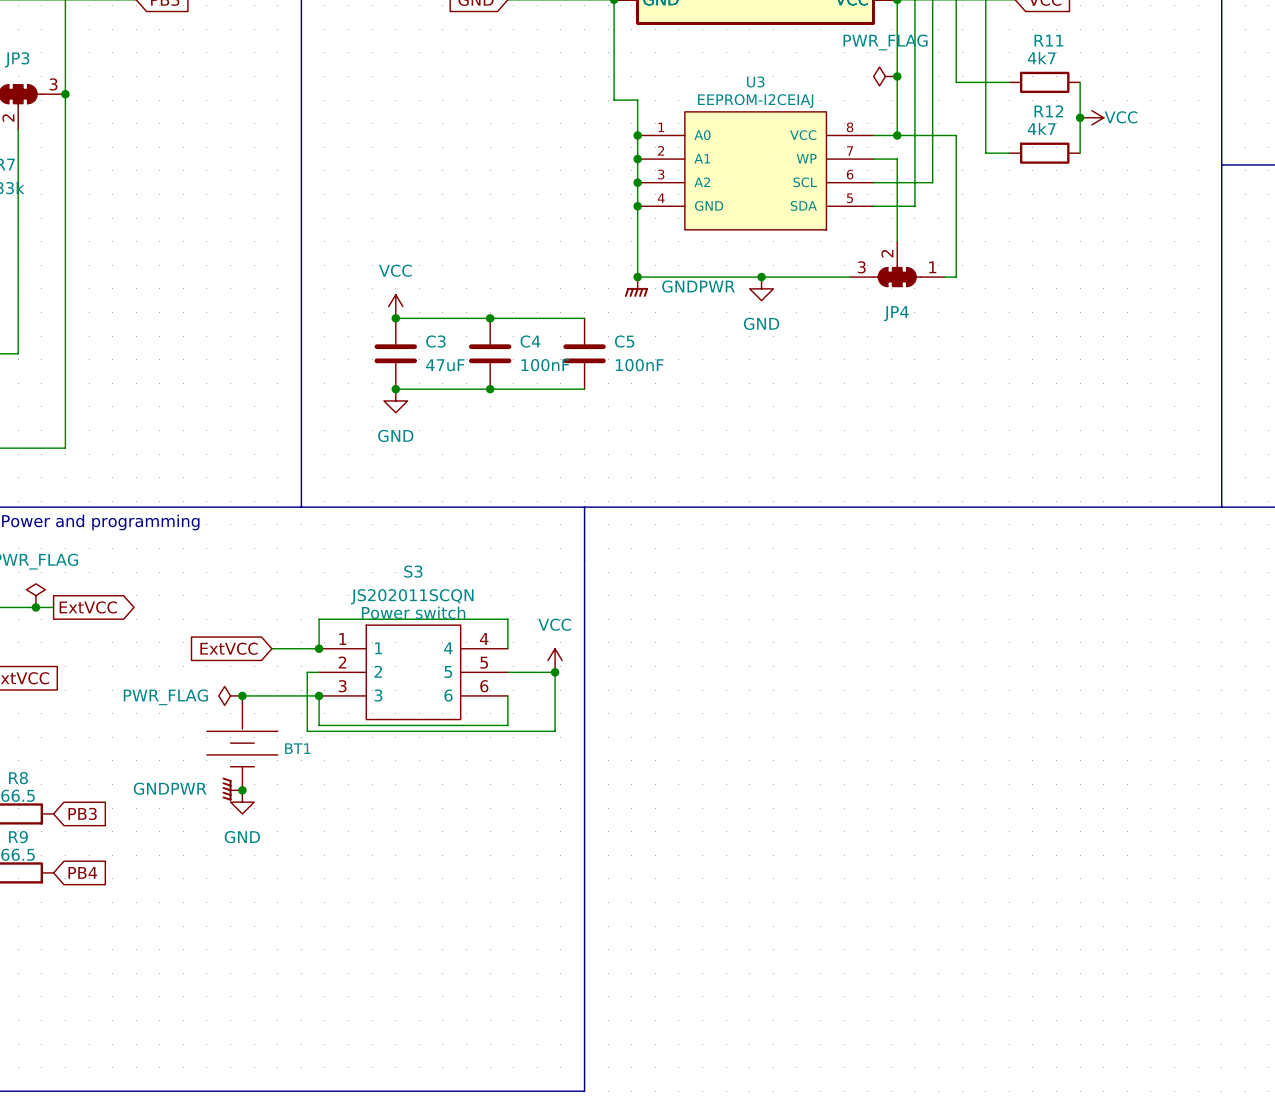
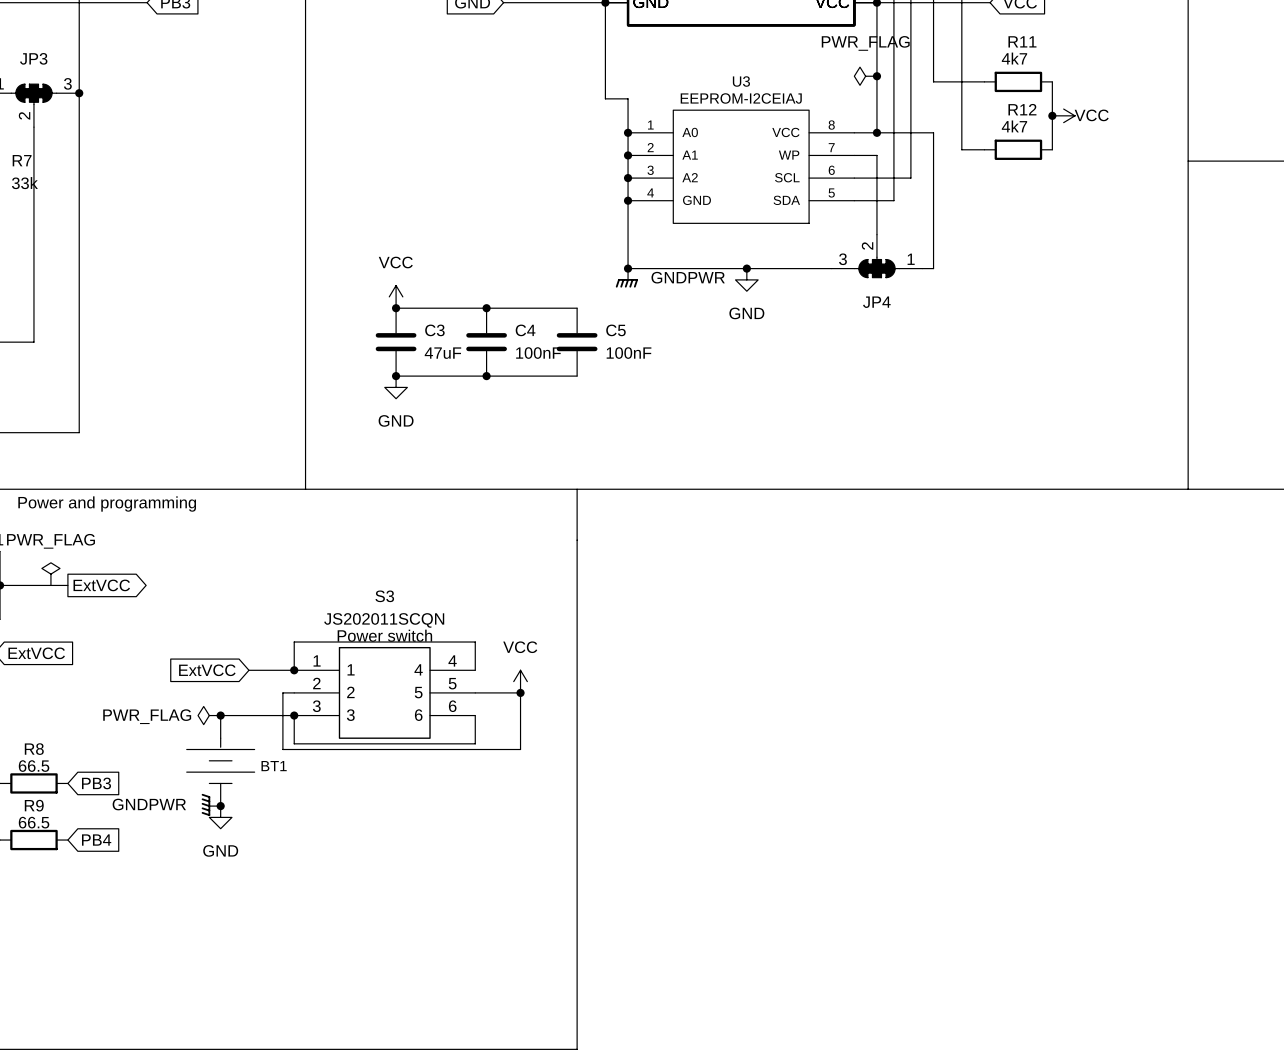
junction: (35, 607) -> none
global label position: ExtVCC (229, 648) -> ExtVCC (207, 670)
wire: (271, 648) (319, 648) (319, 619) (507, 619) (507, 648) -> none
junction: (319, 648) -> none
power symbol position: VCC (555, 660) -> VCC (520, 681)
wire: (319, 672) (307, 672) (307, 731) (555, 731) (555, 672) (507, 672) -> (294, 692) (282, 692) (282, 749) (520, 749) (520, 692) (475, 692)
S3 position: (413, 672) -> (384, 692)
junction position: (555, 672) -> (520, 692)
power symbol position: PWR_FLAG (230, 695) -> PWR_FLAG (209, 715)
junction: (242, 695) -> none
wire: (289, 695) (319, 695) (319, 725) (507, 725) (507, 695) -> (294, 670) (294, 642) (475, 642) (475, 670)
junction: none -> (294, 670)
junction: (319, 695) -> none
wire: none -> (220, 715) (294, 715) (294, 743) (475, 743) (475, 715)
junction: none -> (220, 715)
BT1 position: (242, 743) -> (220, 760)
junction: none -> (294, 715)
power symbol position: GNDPWR (232, 789) -> GNDPWR (211, 804)
junction: (242, 790) -> none
power symbol position: GND (242, 802) -> GND (220, 817)
junction: none -> (220, 806)

